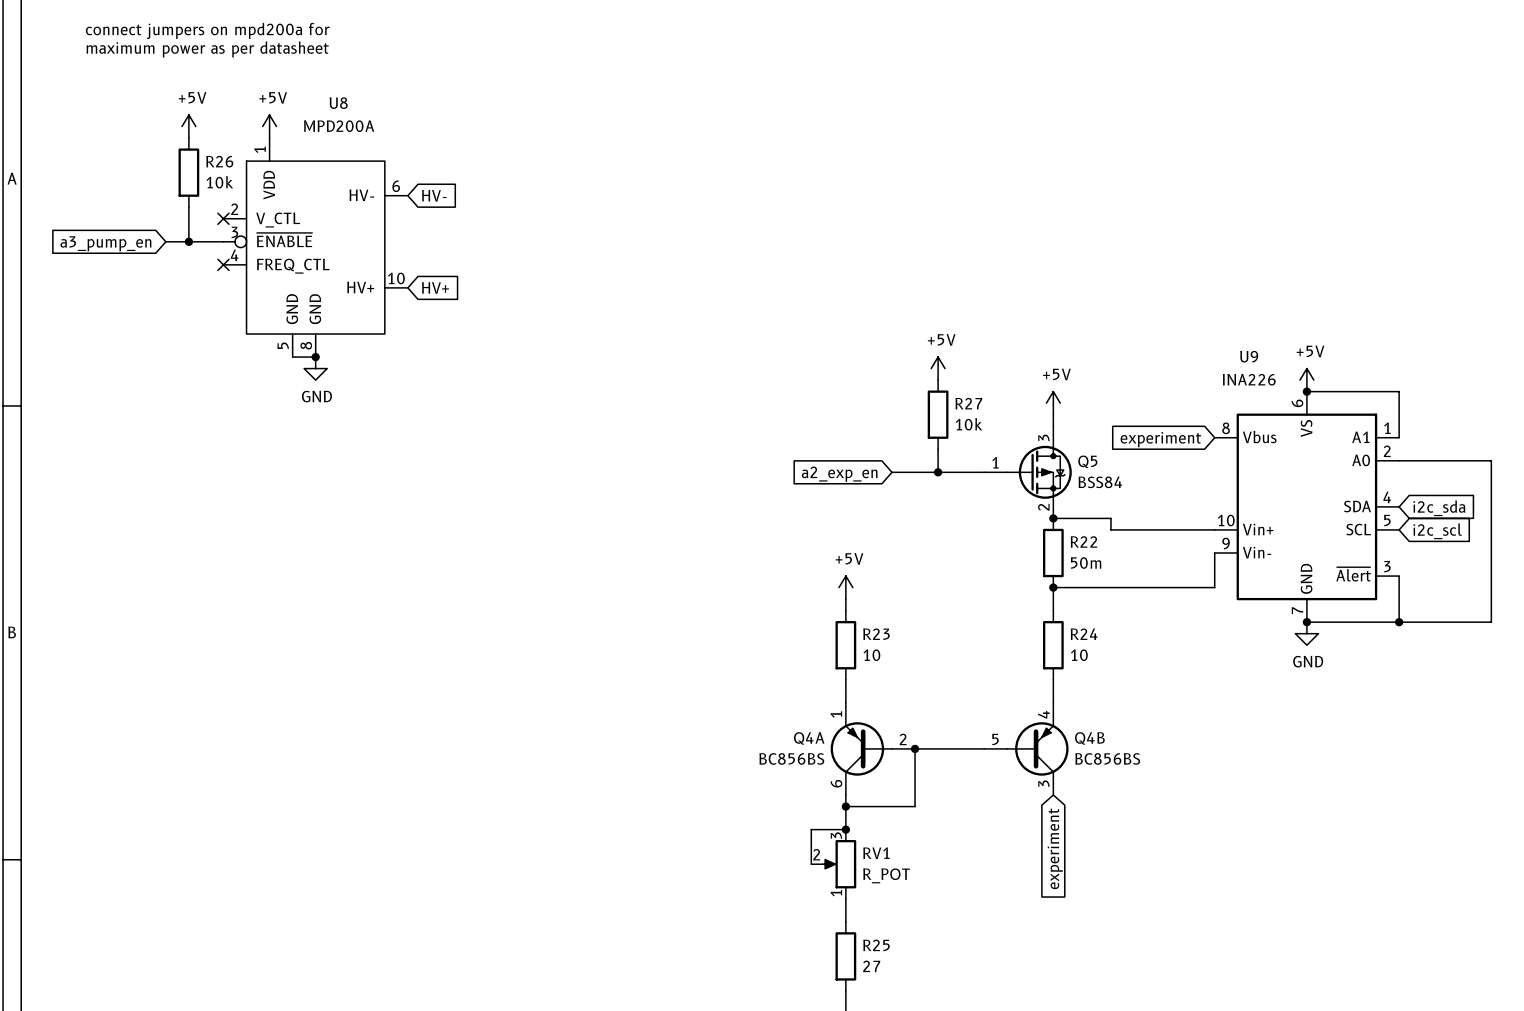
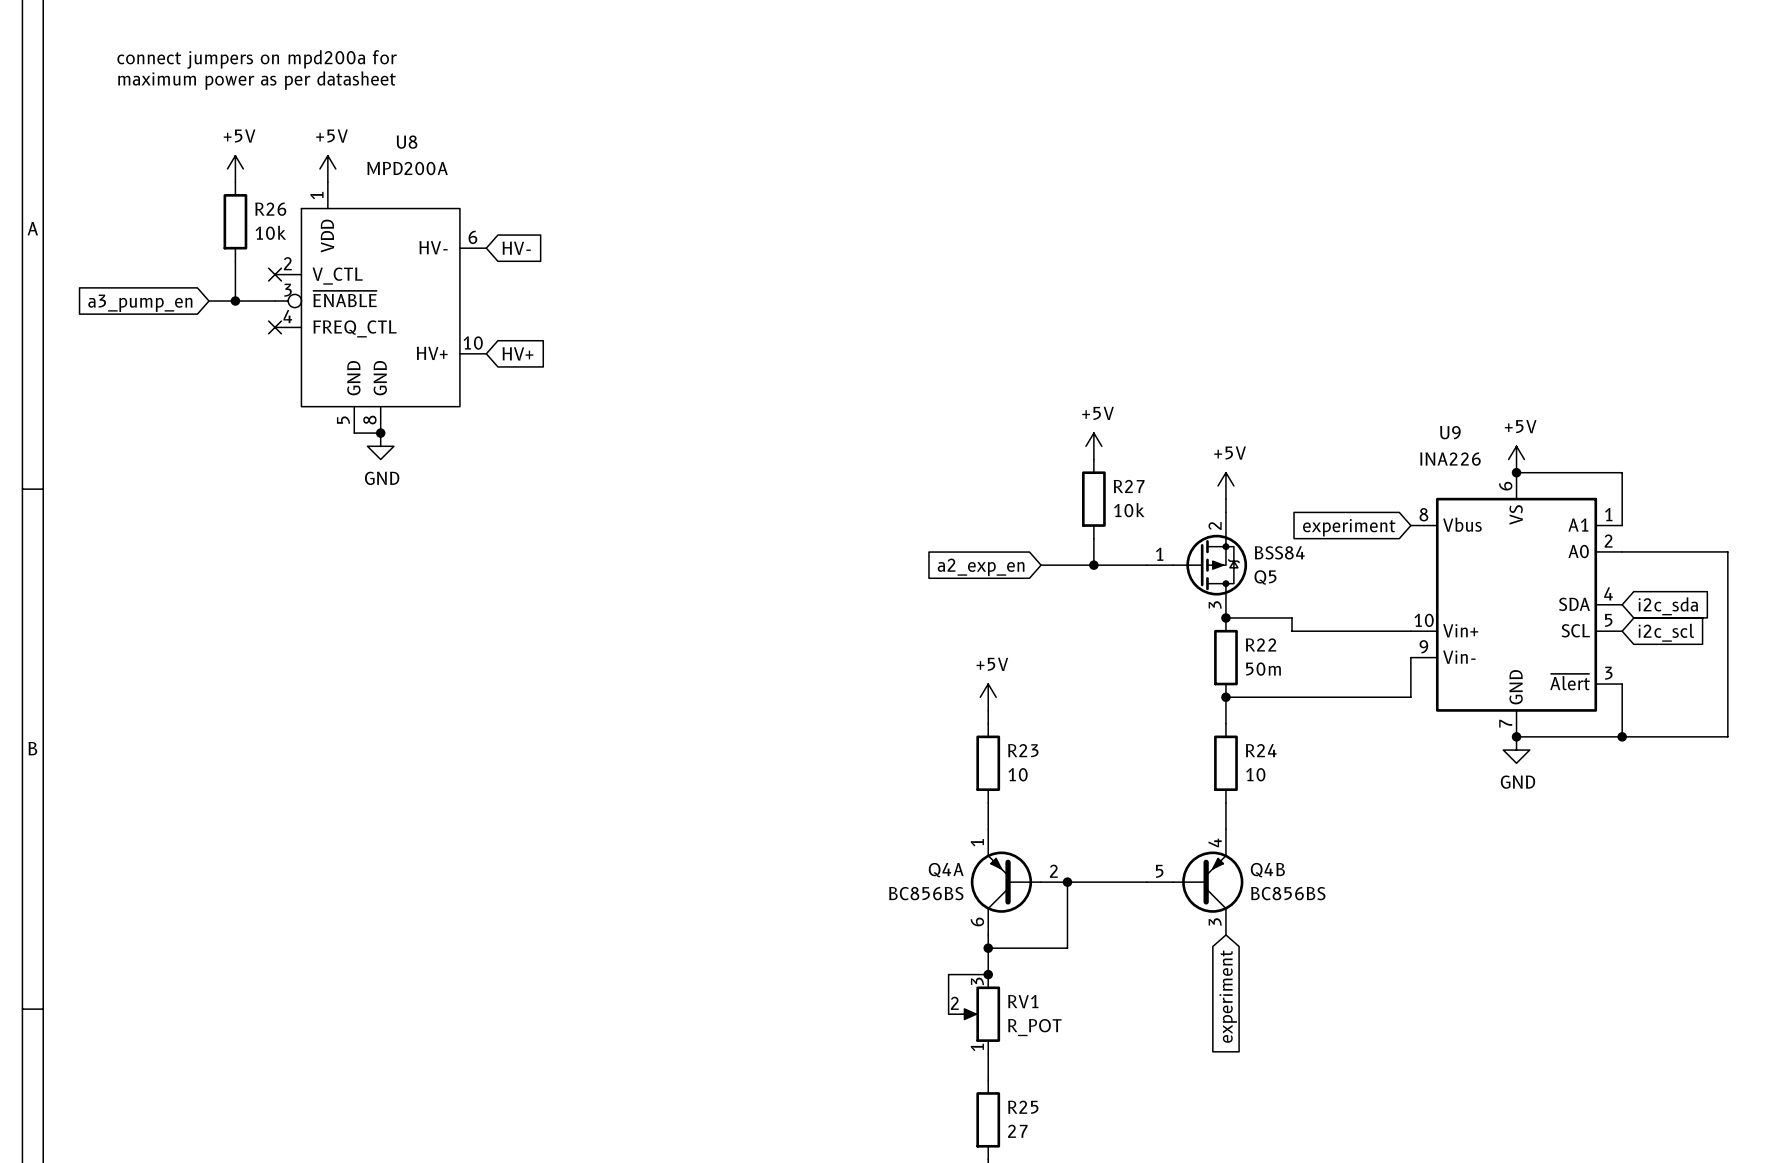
Q5 flip: as is (1039, 472) -> up-down (1210, 565)

